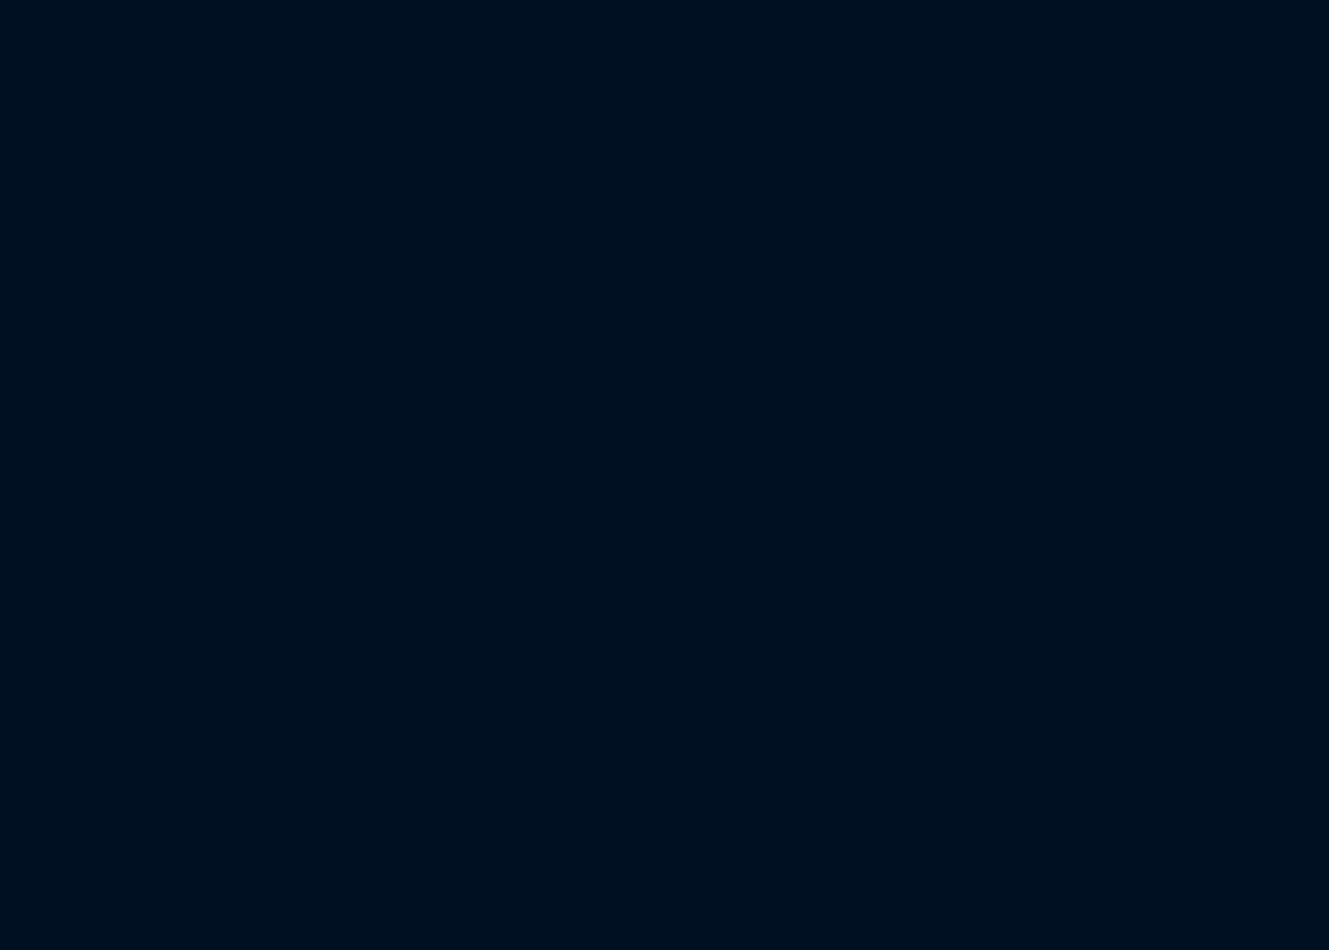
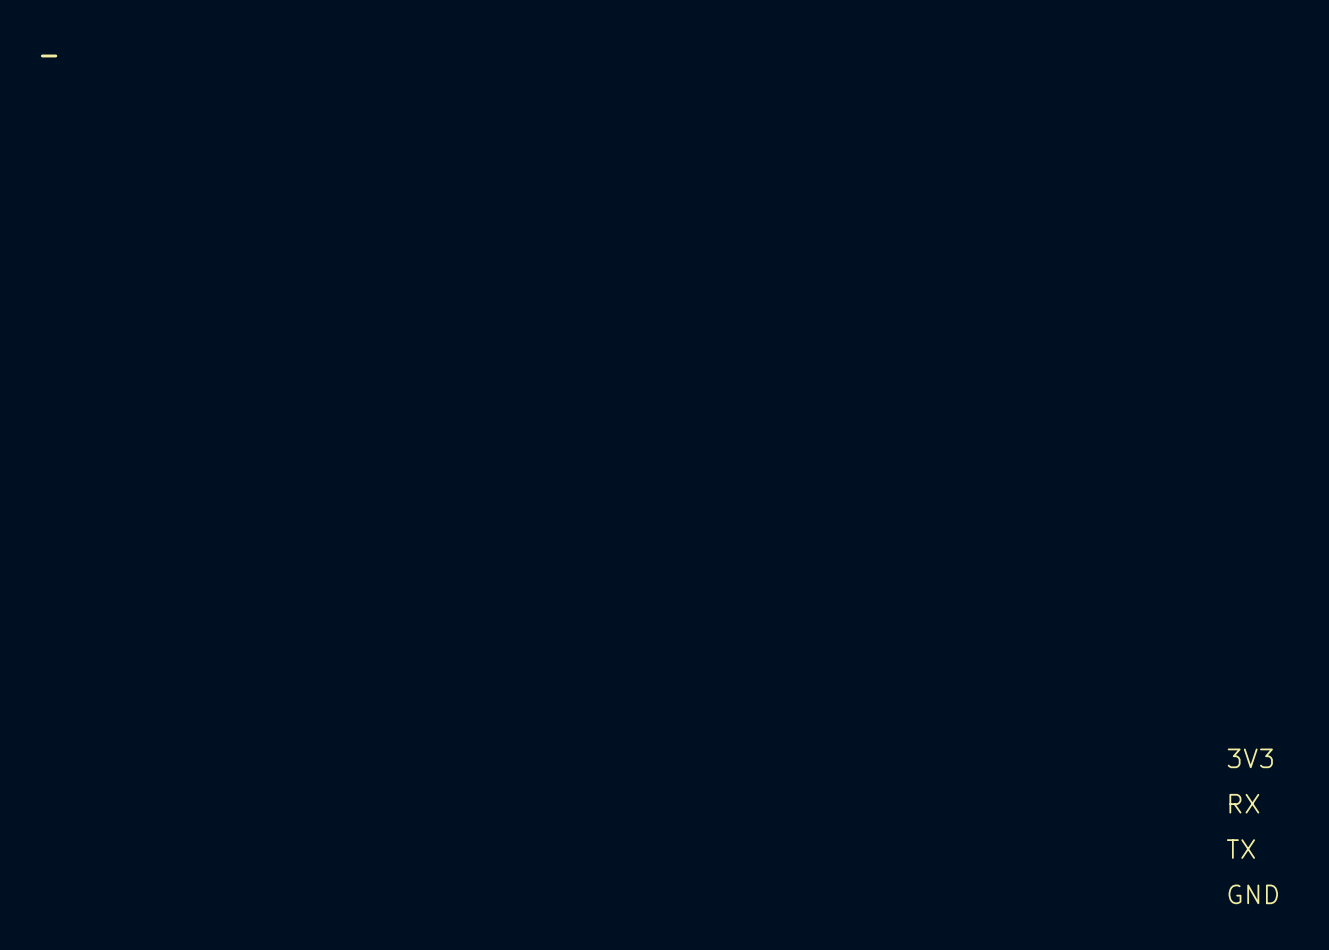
text: none -> - (49, 55)
text: none -> 3V3 (1250, 758)
text: none -> RX (1244, 803)
text: none -> TX (1240, 849)
text: none -> GND (1253, 894)

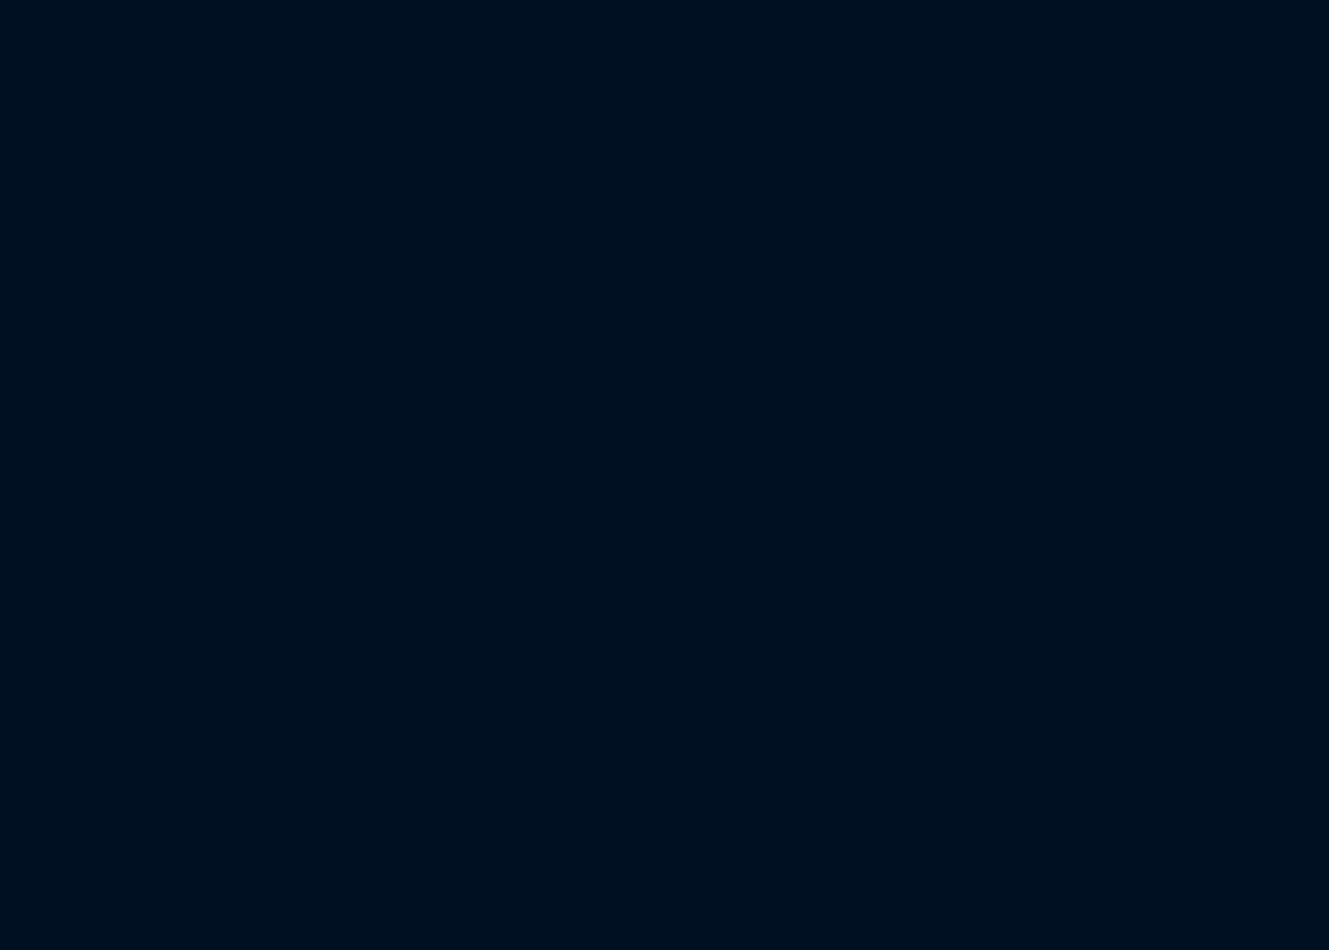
text: - (49, 55) -> none
text: 3V3 (1250, 758) -> none
text: RX (1244, 803) -> none
text: TX (1240, 849) -> none
text: GND (1253, 894) -> none

